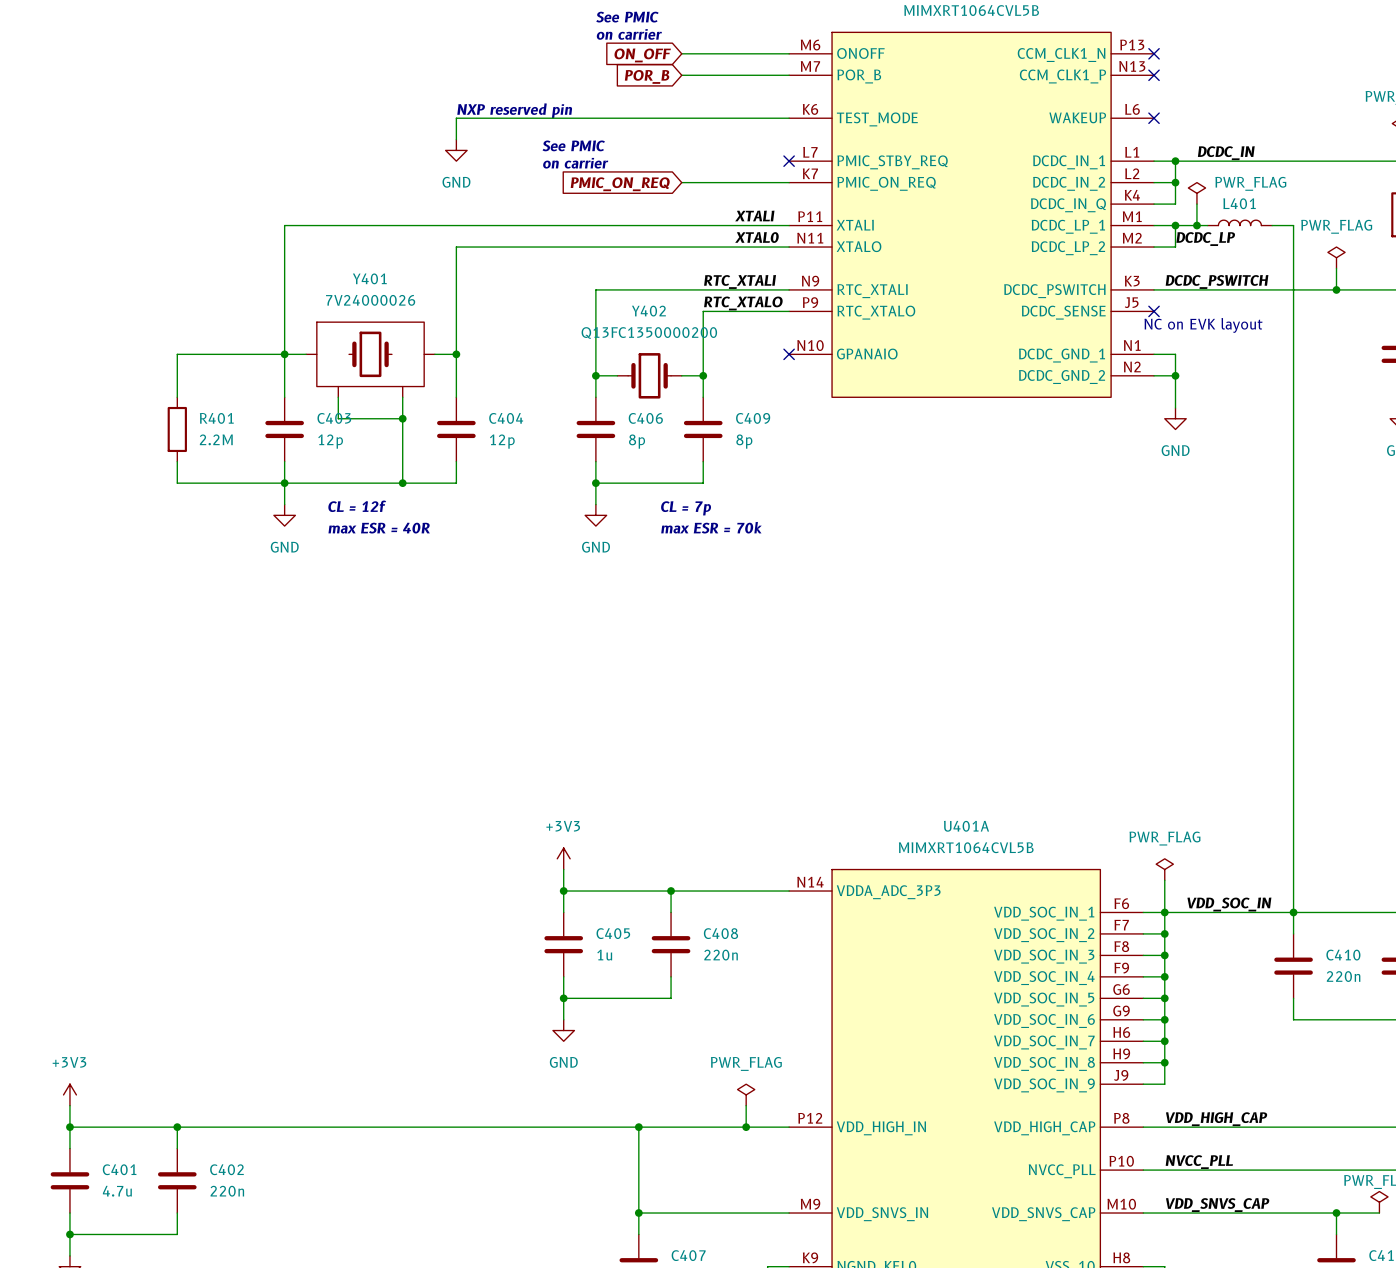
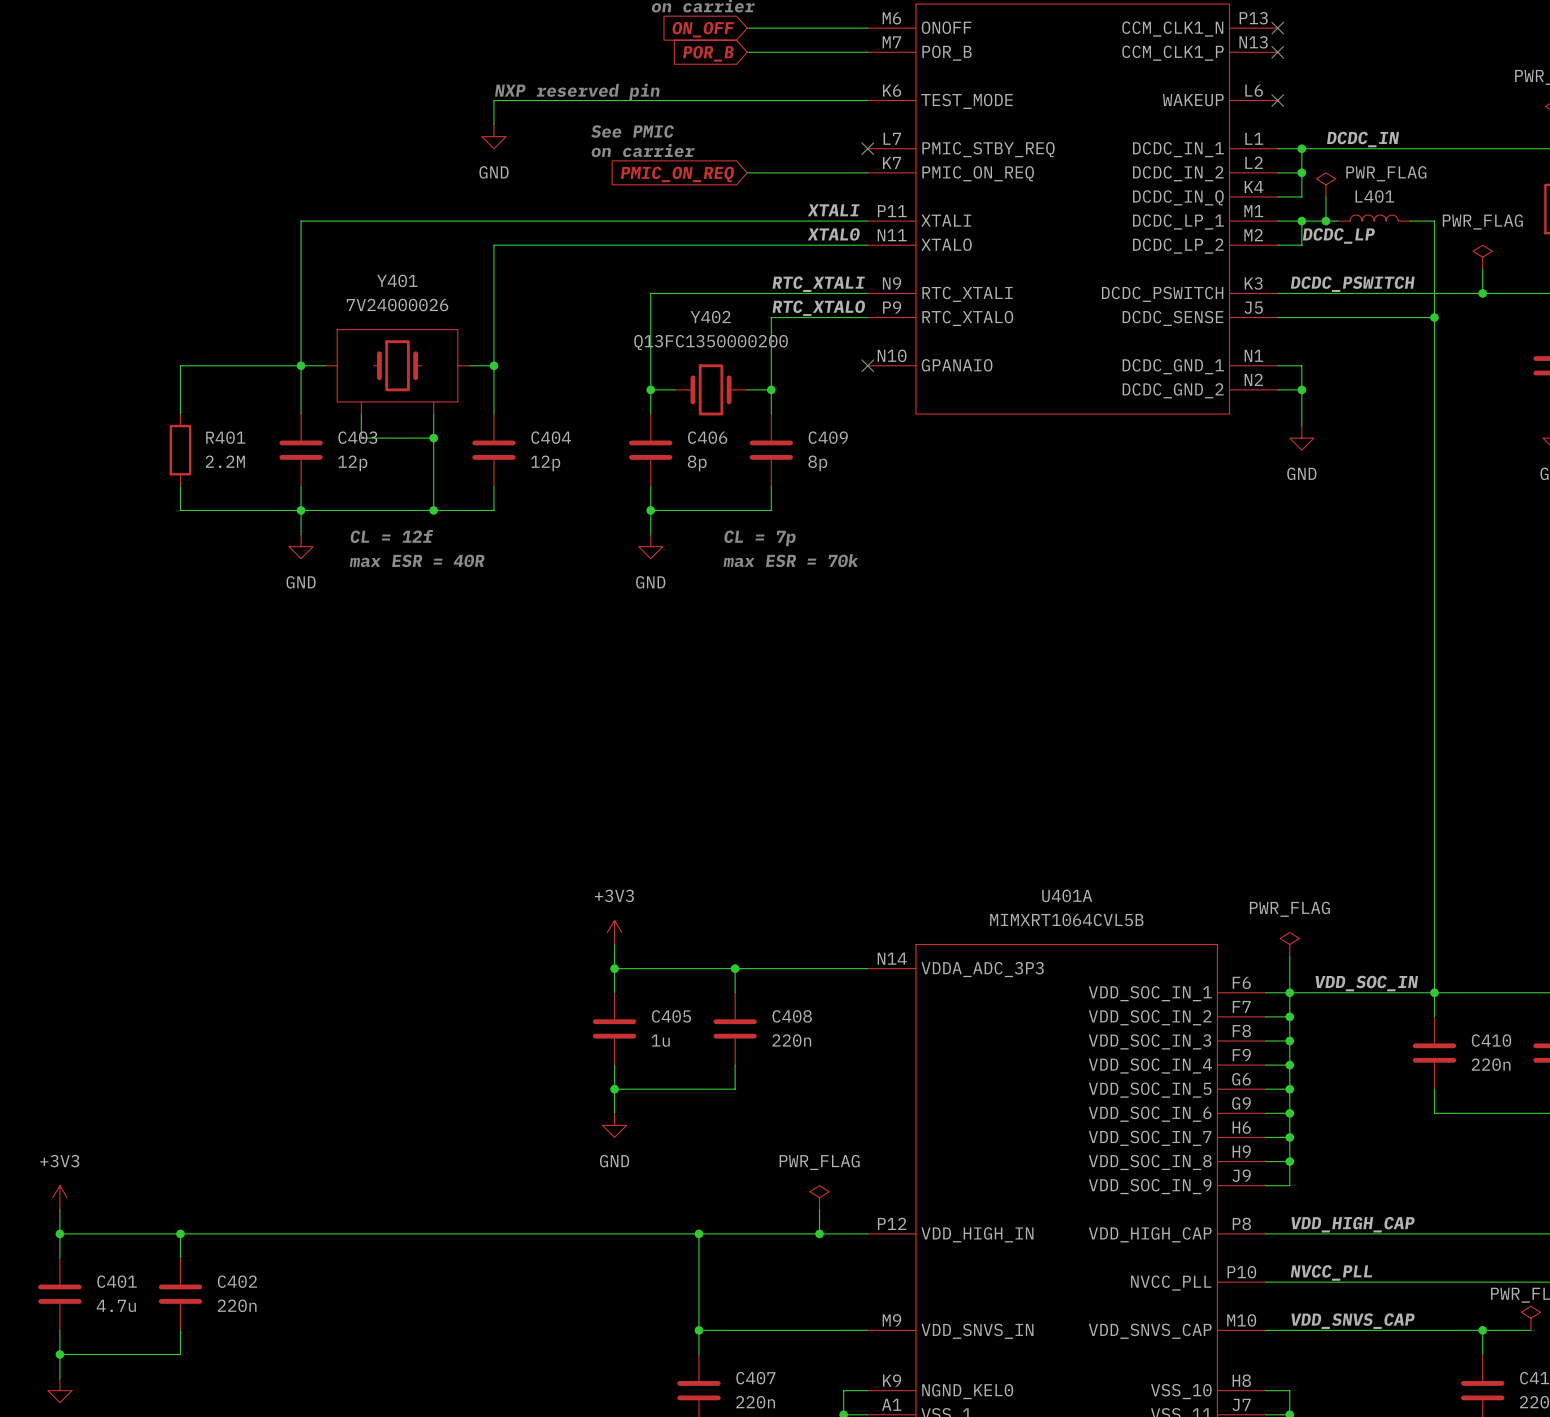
wire: none -> (1277, 317) (1434, 317)
no-connect mark: (1154, 311) -> none
junction: none -> (1434, 317)
text: NC on EVK layout (1203, 325) -> none

